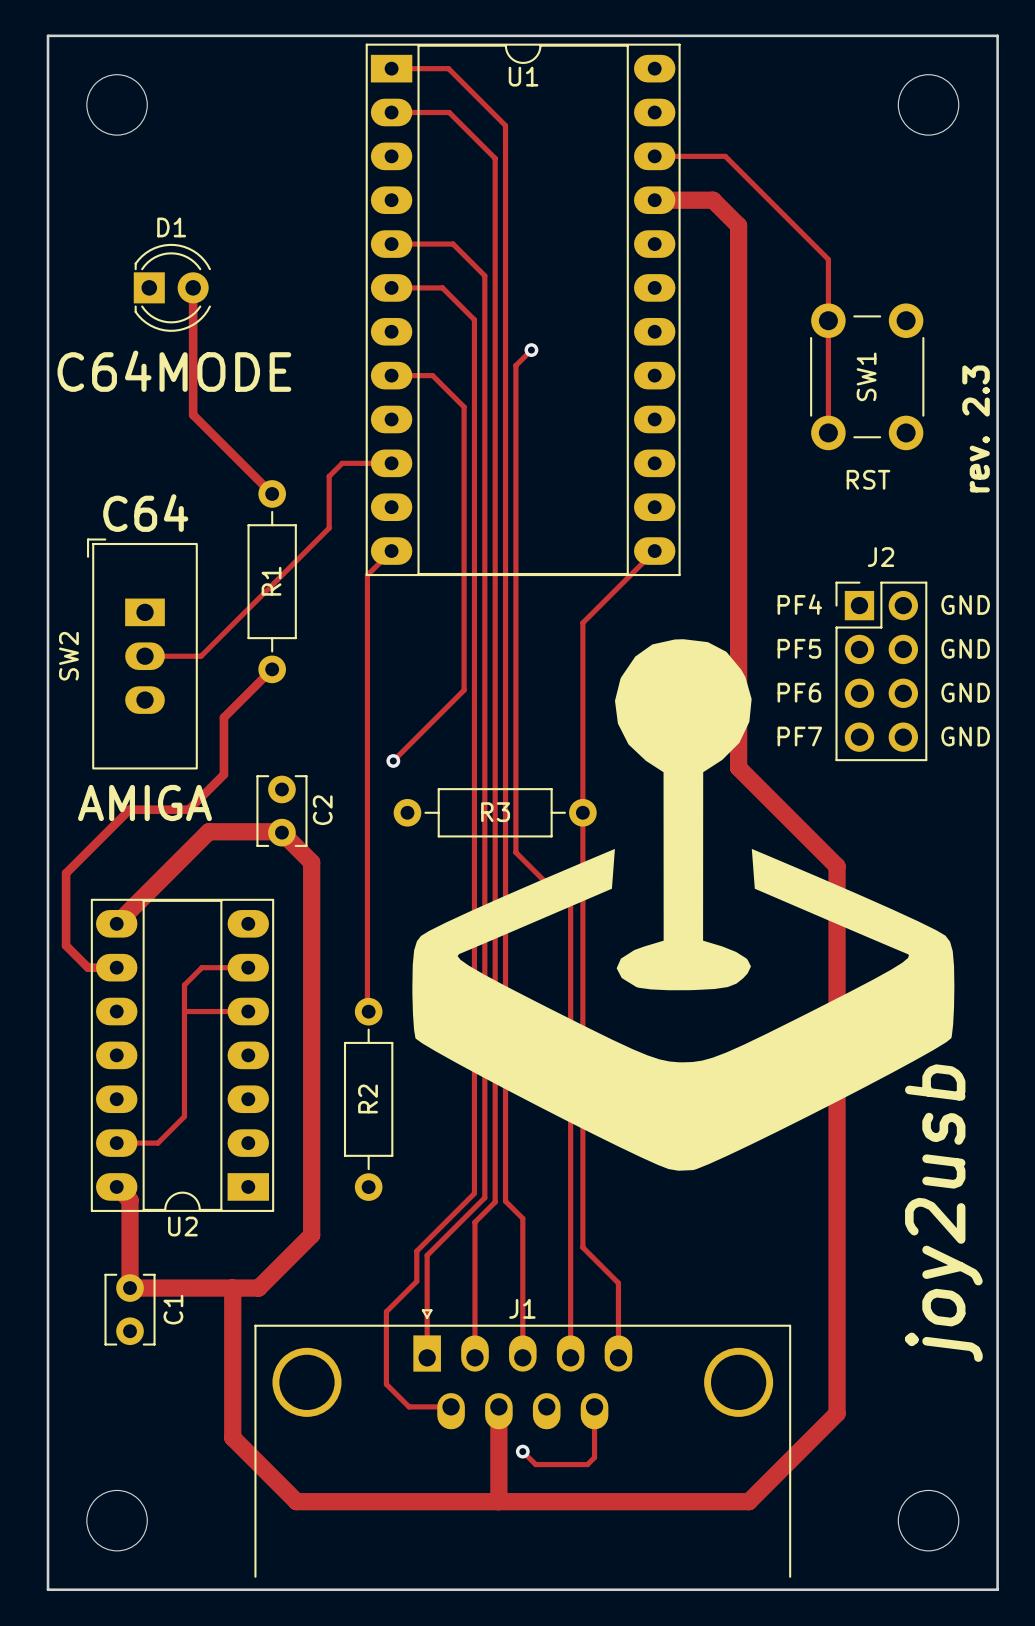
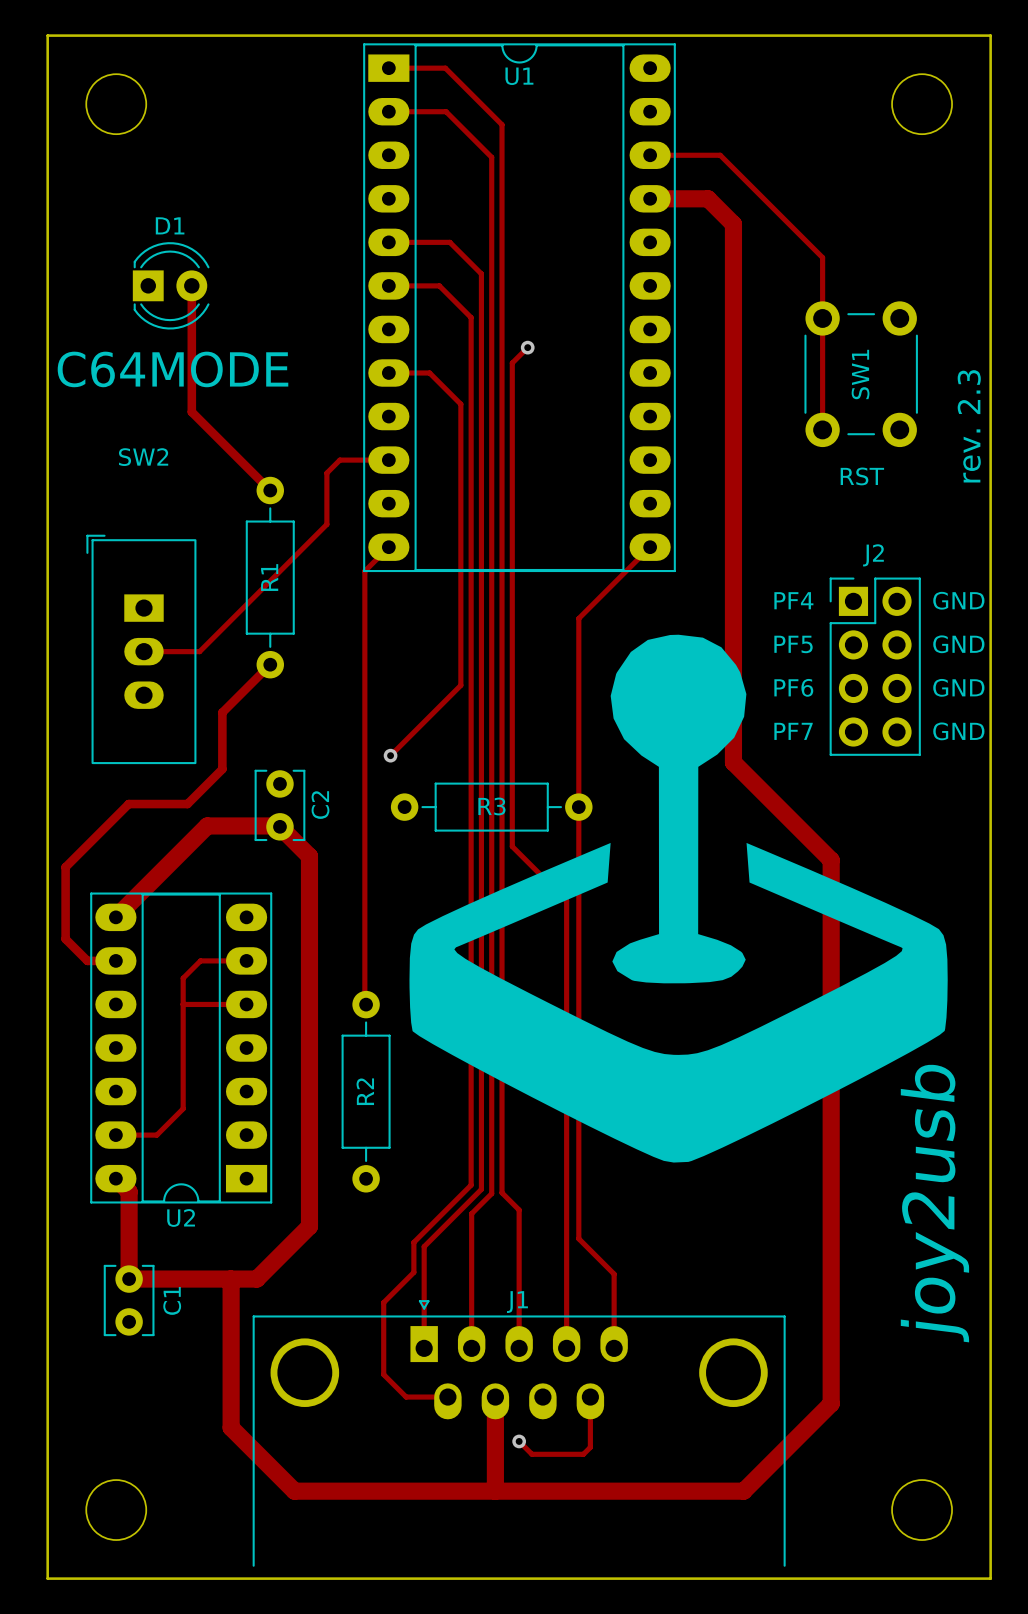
SW2 text: C64 (145, 513) -> none
SW2 name rotation: 0° (68, 656) -> 90° clockwise (143, 457)
SW2 name position: SW2 (68, 656) -> SW2 (143, 457)
SW2 text: AMIGA (145, 802) -> none

